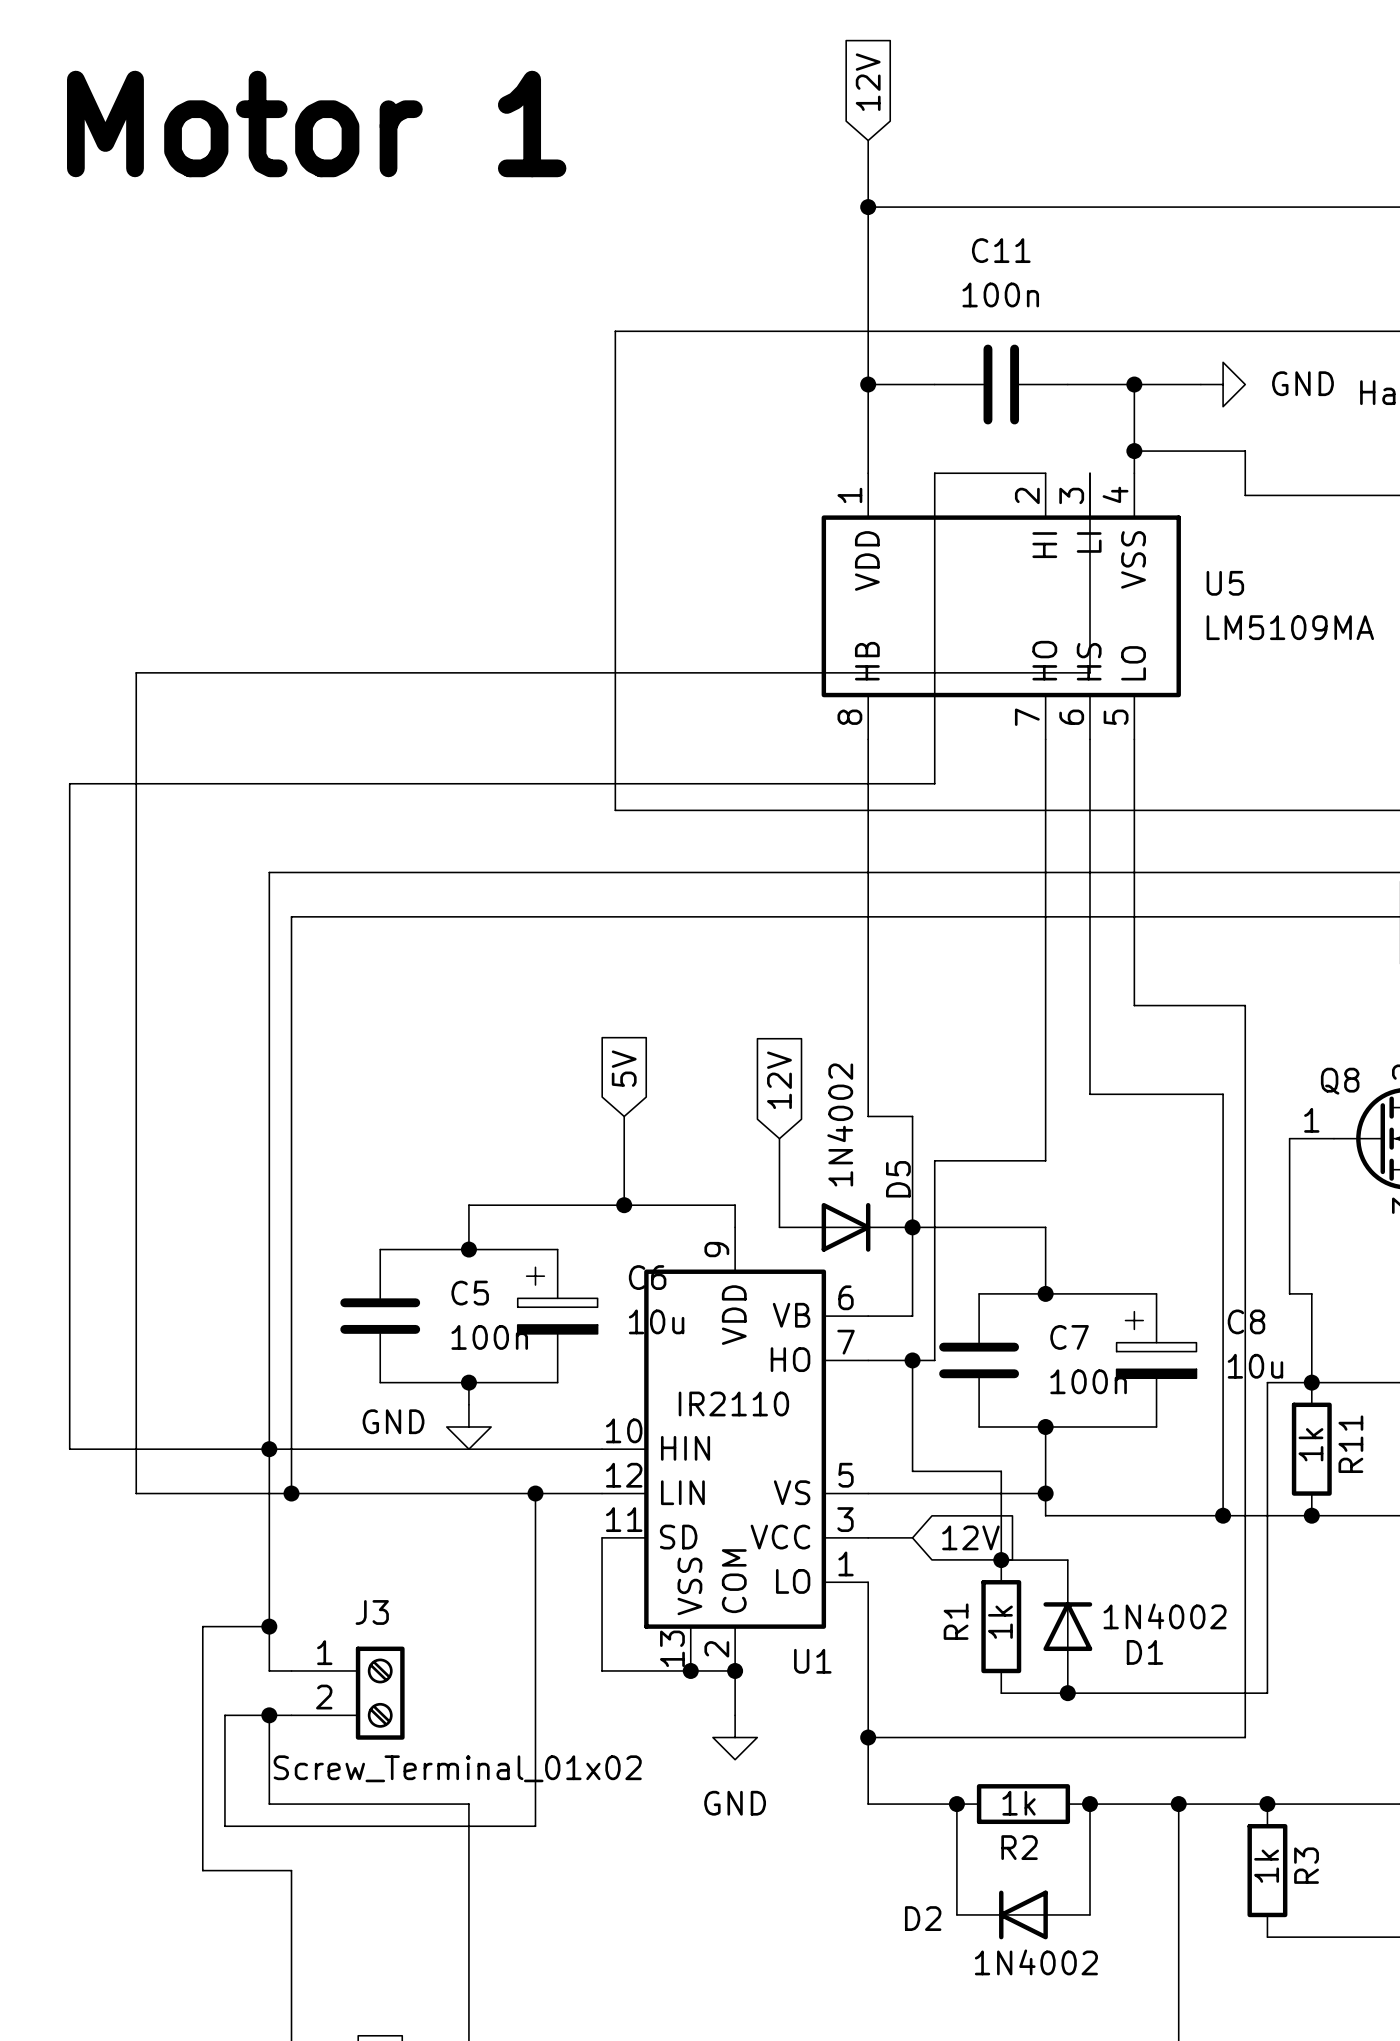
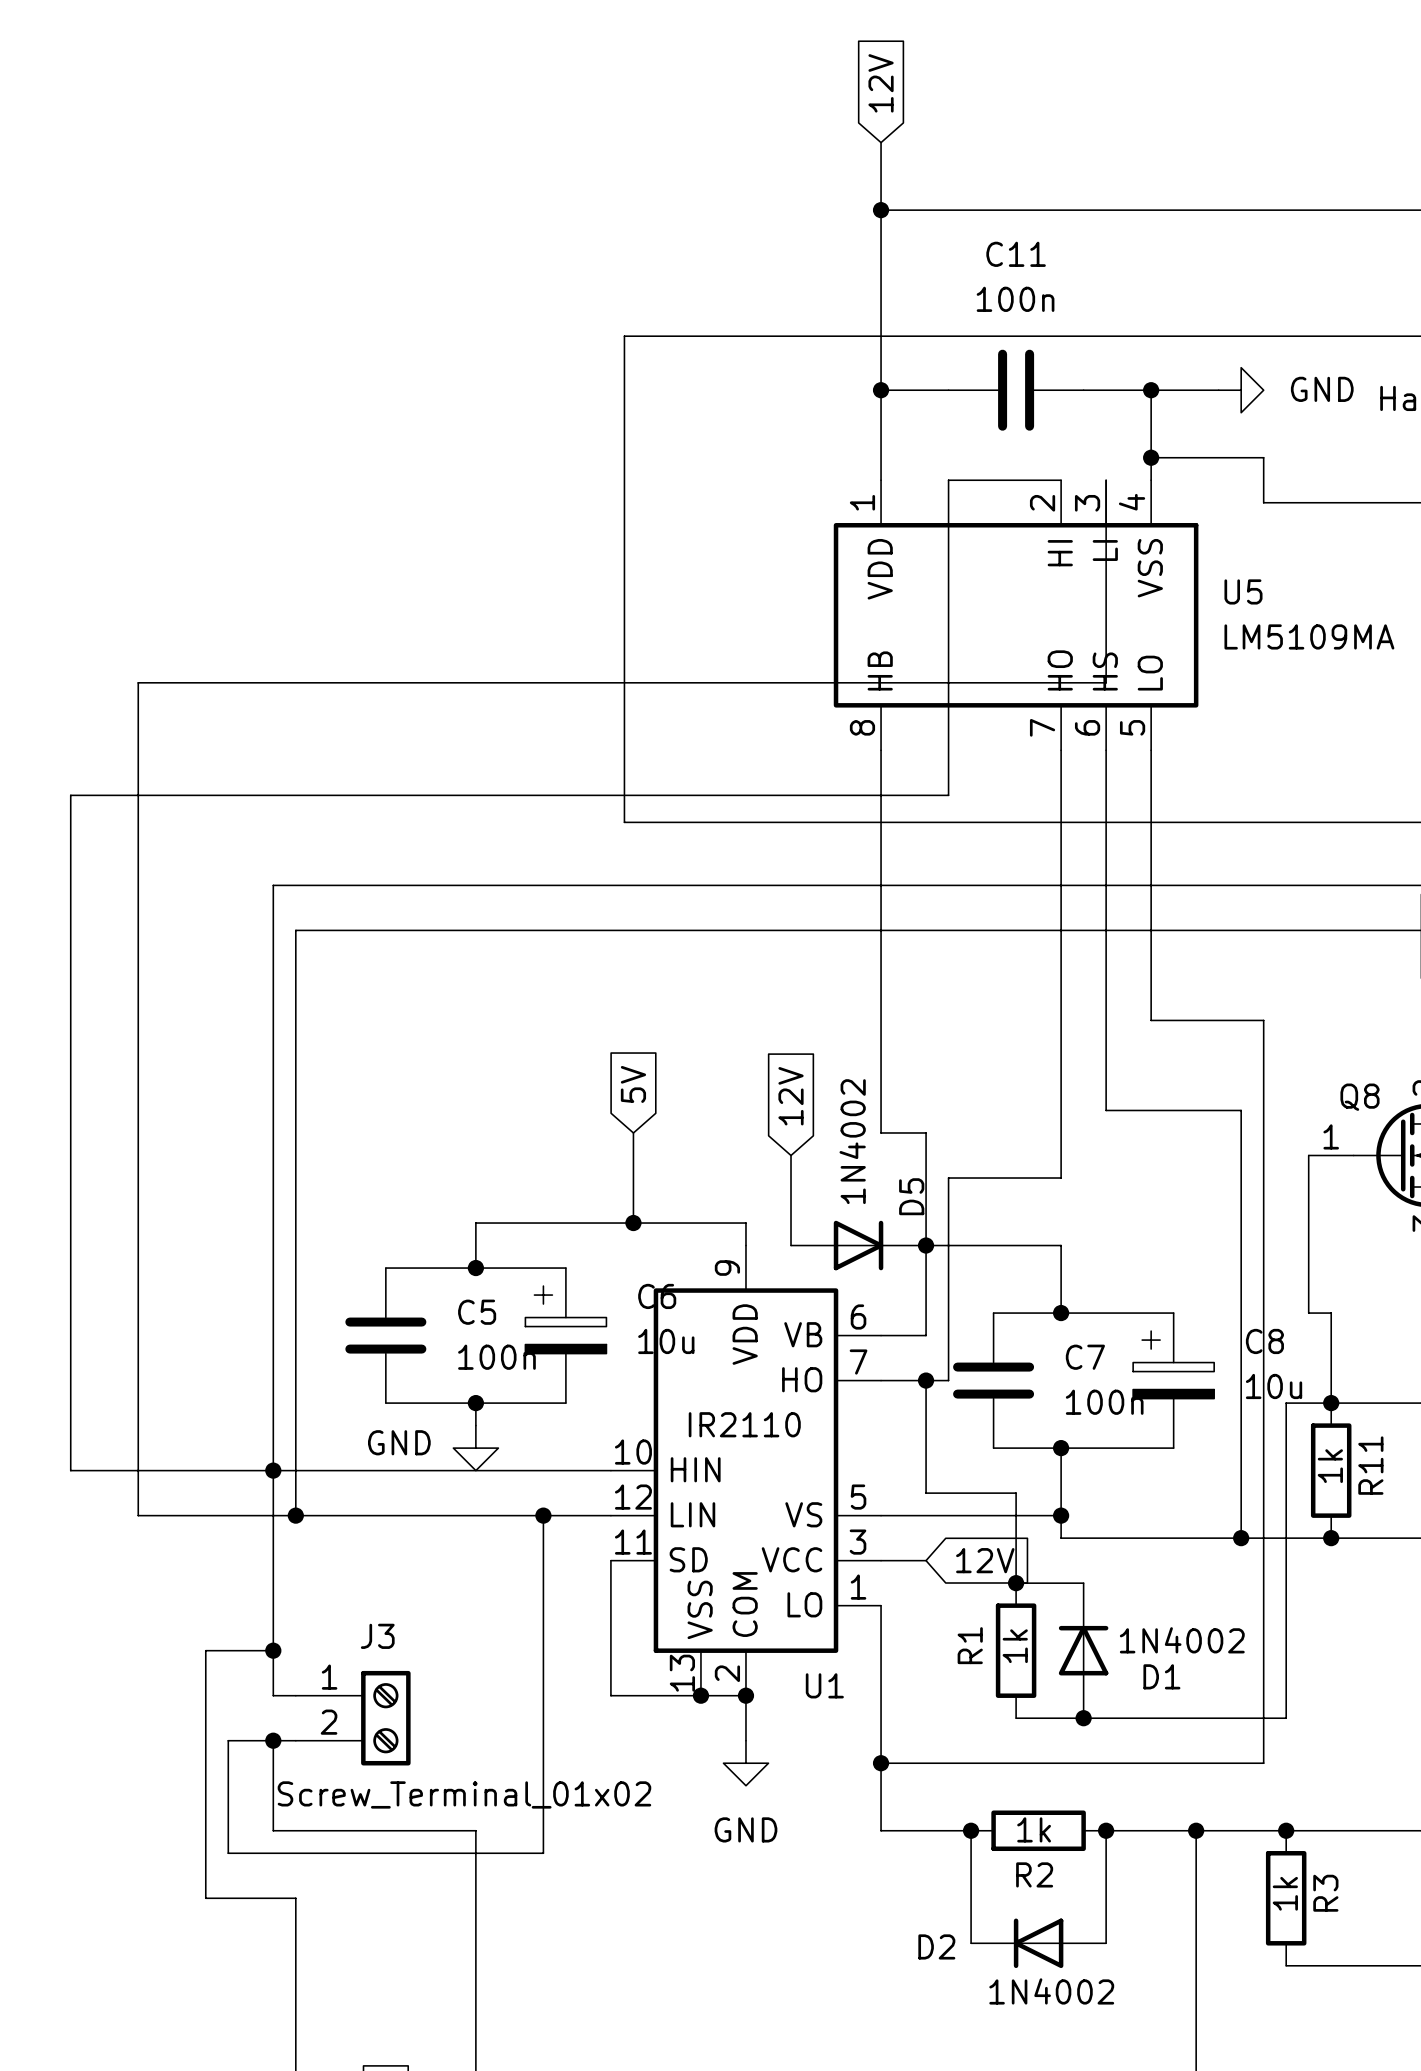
text: Motor 1 (316, 123) -> none

